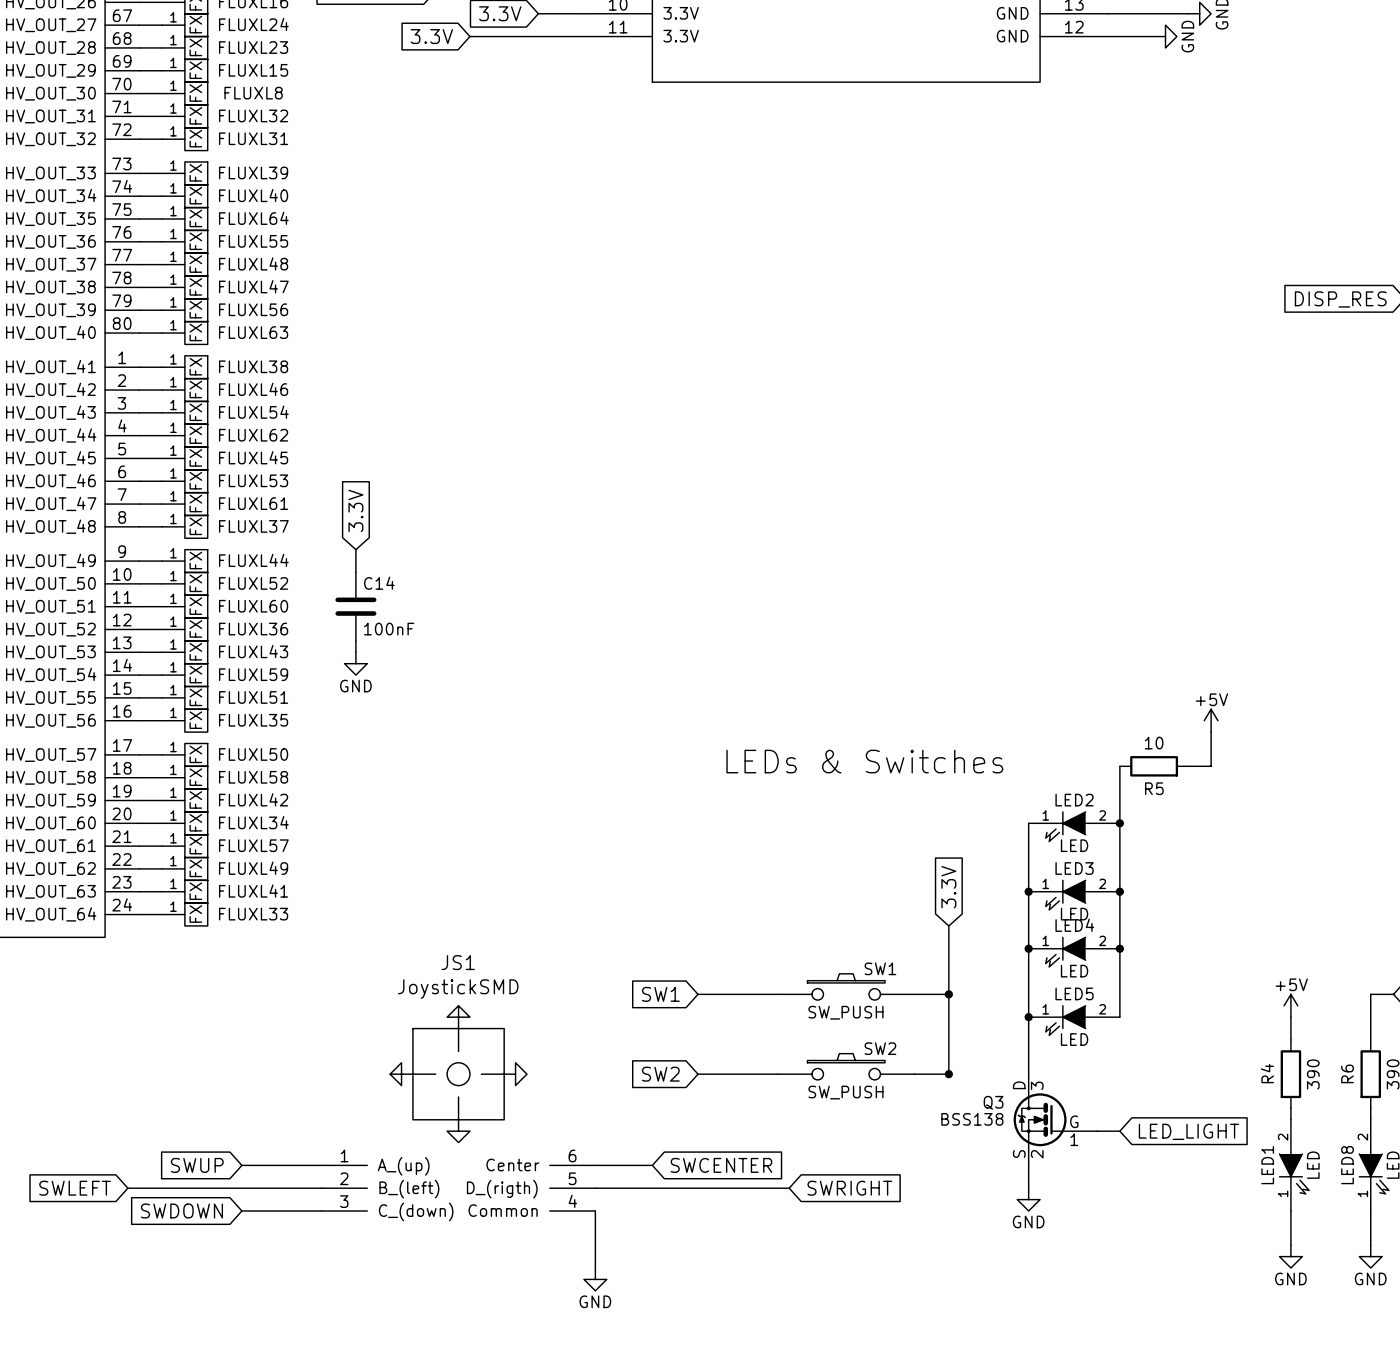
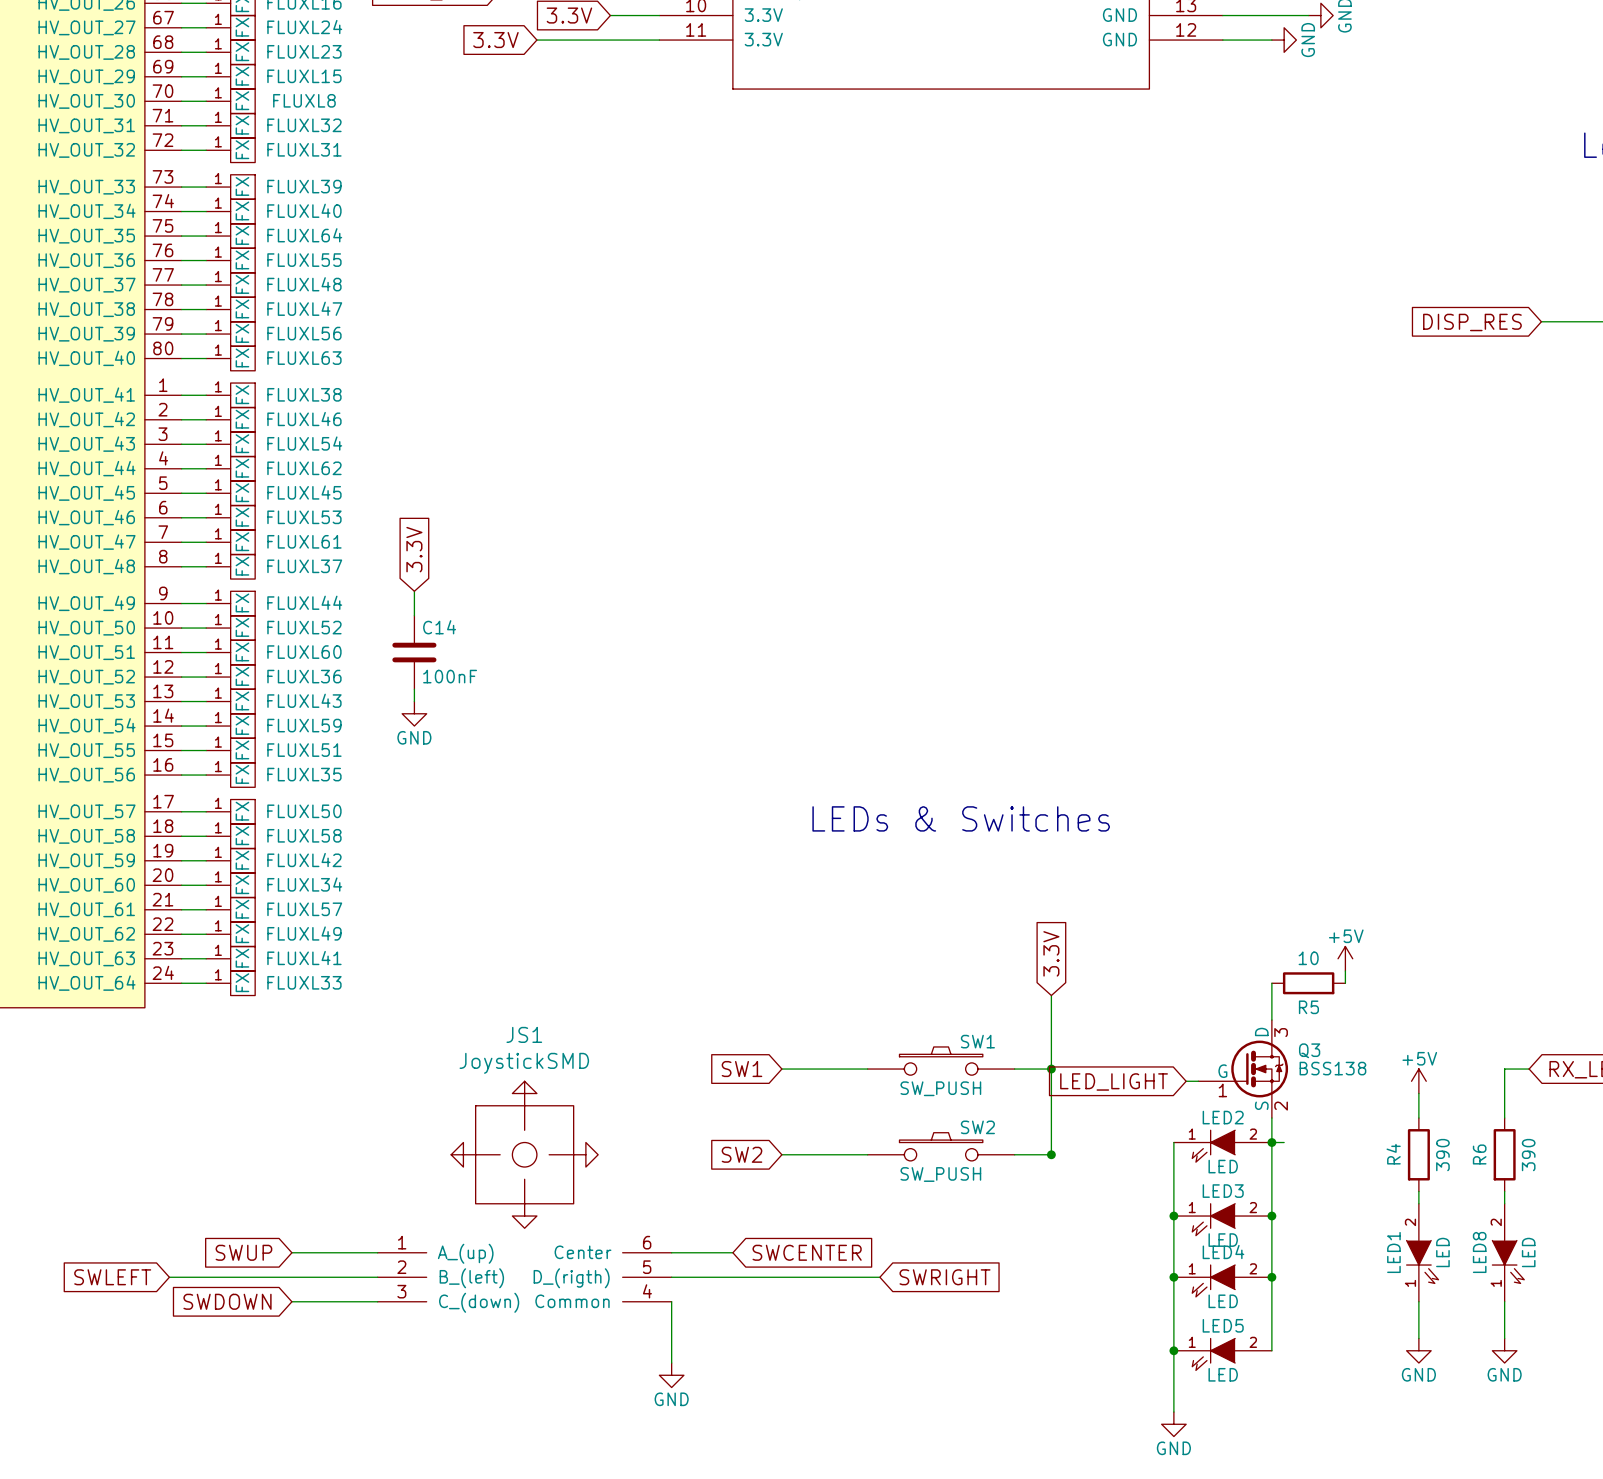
power symbol position: +5V (1211, 720) -> +5V (1345, 958)
wire: (1211, 732) (1211, 766) (1188, 766) -> none
wire: (1119, 766) (1119, 1017) -> none
R5 position: (1154, 766) -> (1308, 983)
wire: (1028, 823) (1028, 1074) -> none
junction: (1119, 823) -> none
LED2 position: (1074, 826) -> (1222, 1146)
junction: (1028, 891) -> none
junction: (1119, 891) -> none
LED3 position: (1074, 895) -> (1222, 1219)
wire: none -> (1345, 971) (1345, 983)
wire: none -> (1271, 983) (1271, 1020)
junction: (1028, 948) -> none
junction: (1119, 948) -> none
LED4 position: (1074, 952) -> (1222, 1280)
wire: none -> (1186, 1081) (1198, 1081)
junction: (1028, 1017) -> none
LED5 position: (1074, 1020) -> (1222, 1354)
wire: none -> (1271, 1118) (1271, 1350)
wire: none -> (1173, 1142) (1173, 1412)
wire: none -> (1271, 1142) (1284, 1142)
junction: none -> (1271, 1142)
Q3 flip: as is (1040, 1119) -> left-right (1259, 1069)
Q3 position: (1055, 1119) -> (1243, 1069)
junction: none -> (1173, 1216)
junction: none -> (1271, 1216)
global label rotation: 0° (1188, 1131) -> 180° (1114, 1081)
global label position: LED_LIGHT (1188, 1131) -> LED_LIGHT (1114, 1081)
wire: (1028, 1165) (1028, 1188) -> none
junction: none -> (1173, 1277)
junction: none -> (1271, 1277)
power symbol position: GND (1028, 1199) -> GND (1173, 1424)
junction: none -> (1173, 1350)

